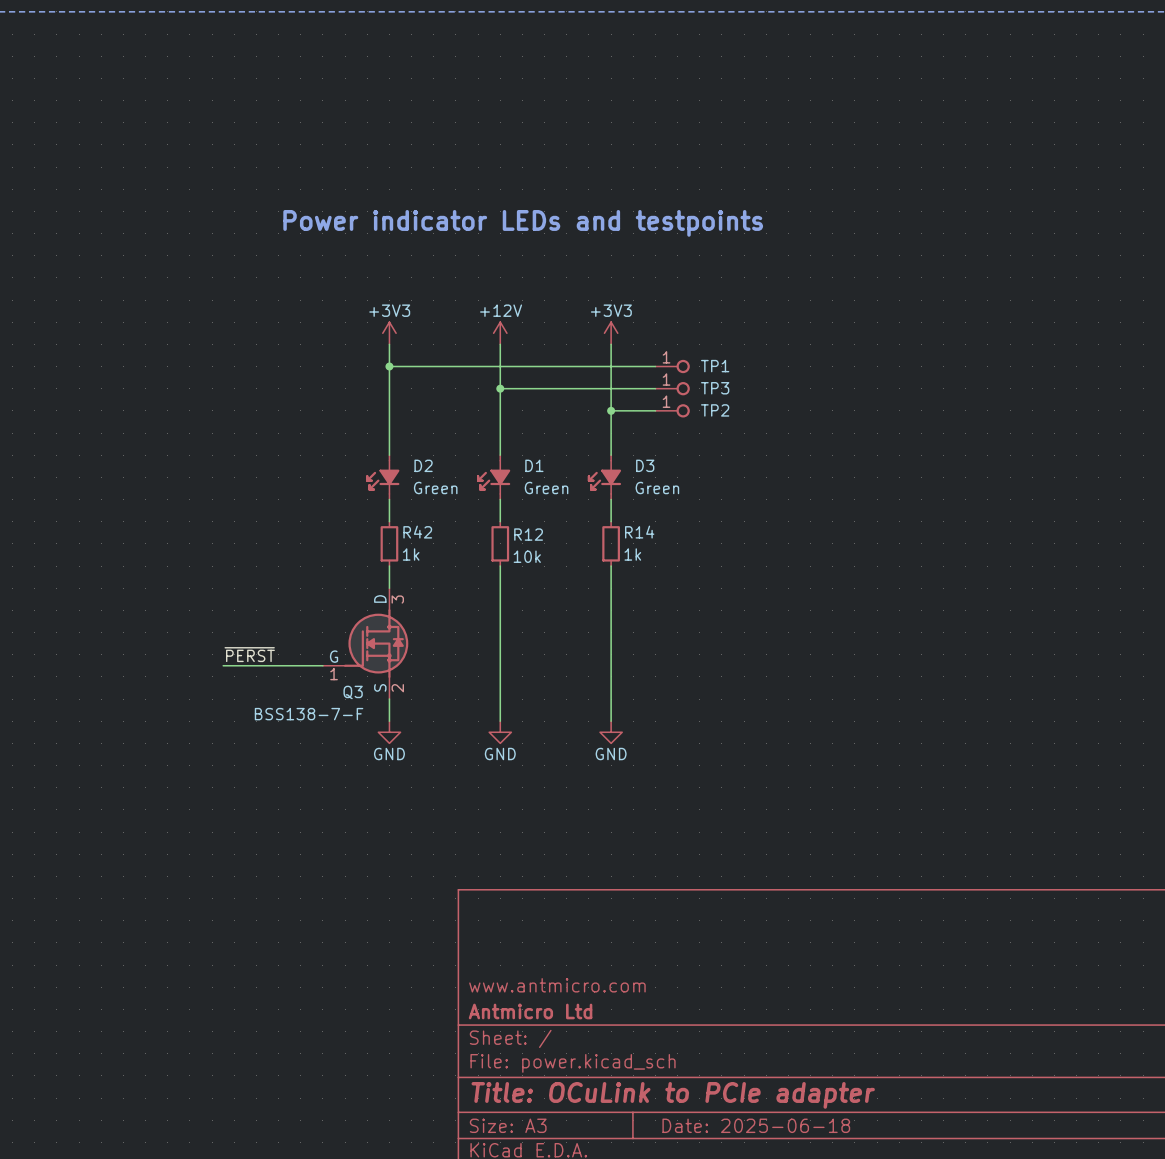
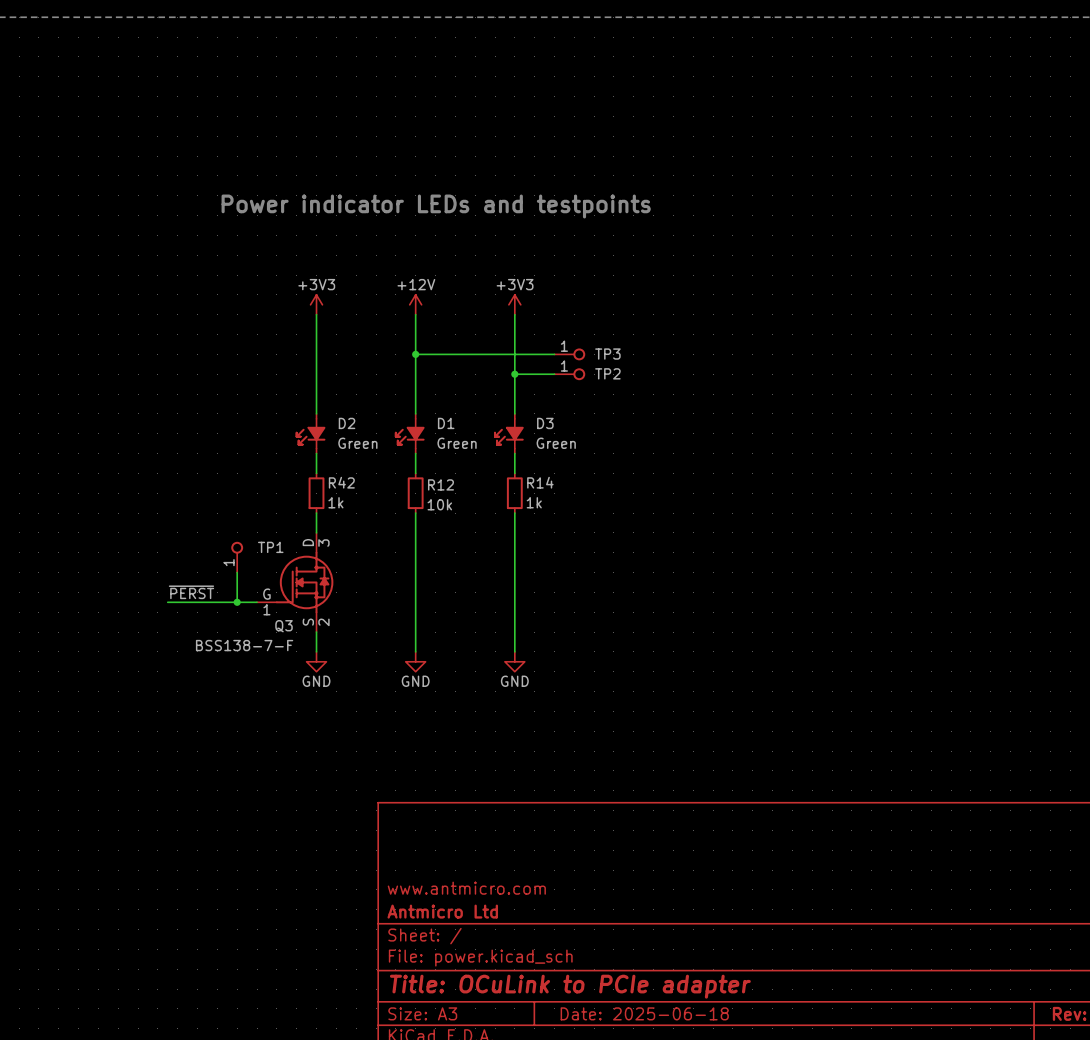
wire: (389, 366) (655, 366) -> none
junction: (389, 366) -> none
TP1 position: (672, 366) -> (237, 557)
TP1 rotation: 0° (683, 366) -> 90° counterclockwise (237, 547)
wire: none -> (237, 572) (237, 602)
junction: none -> (237, 602)

